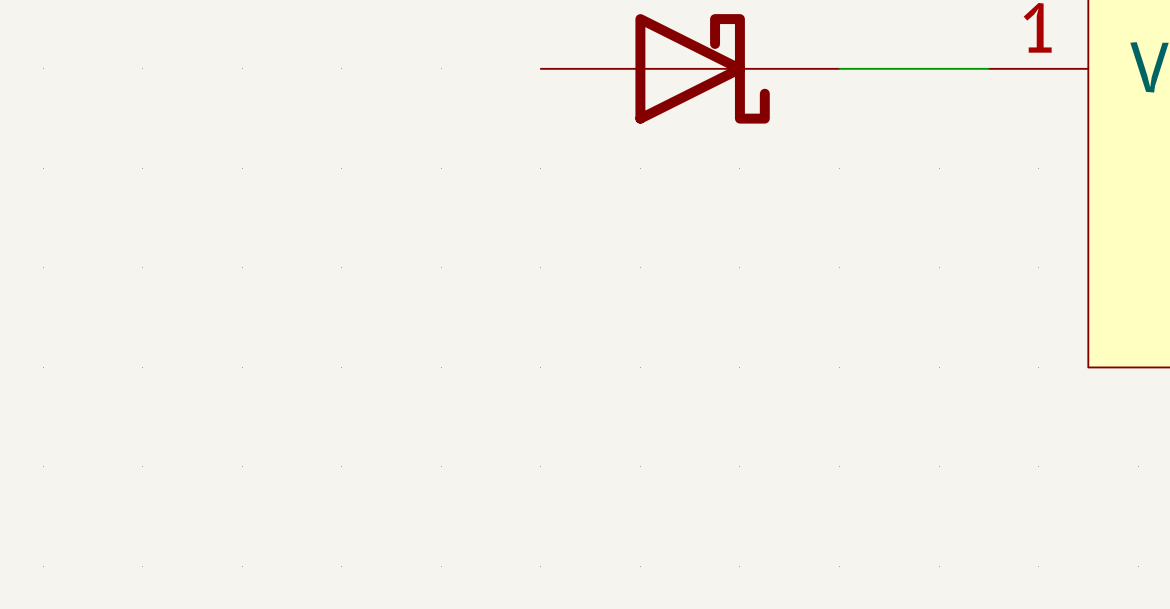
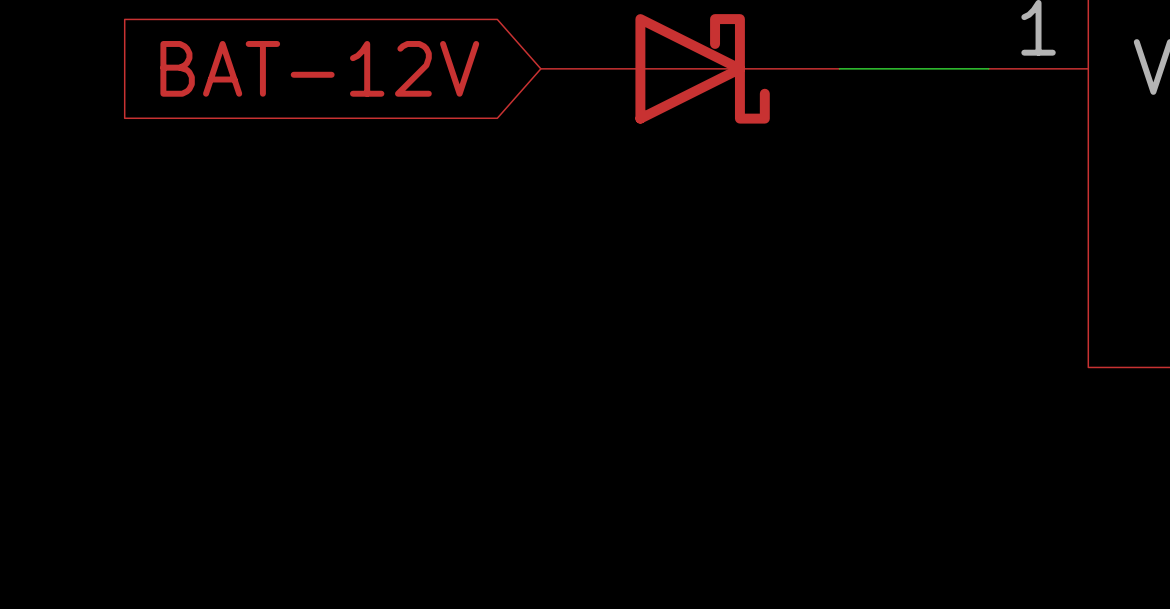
global label: none -> BAT-12V (319, 68)

